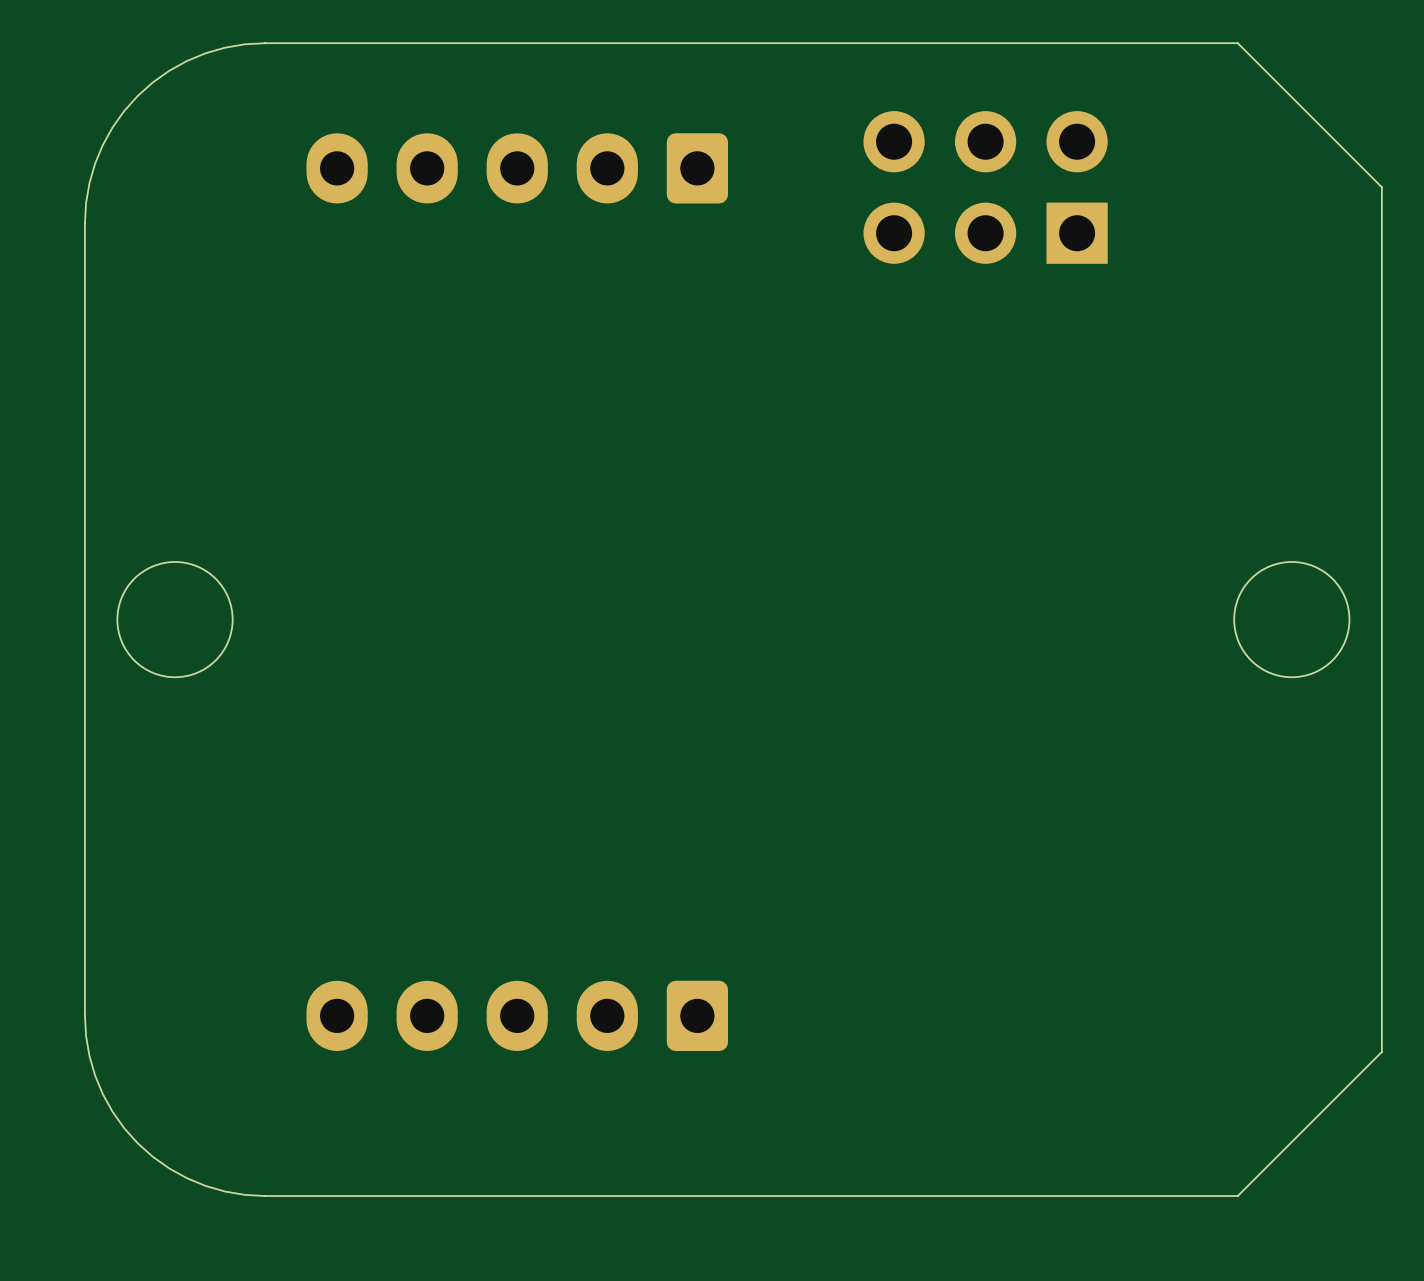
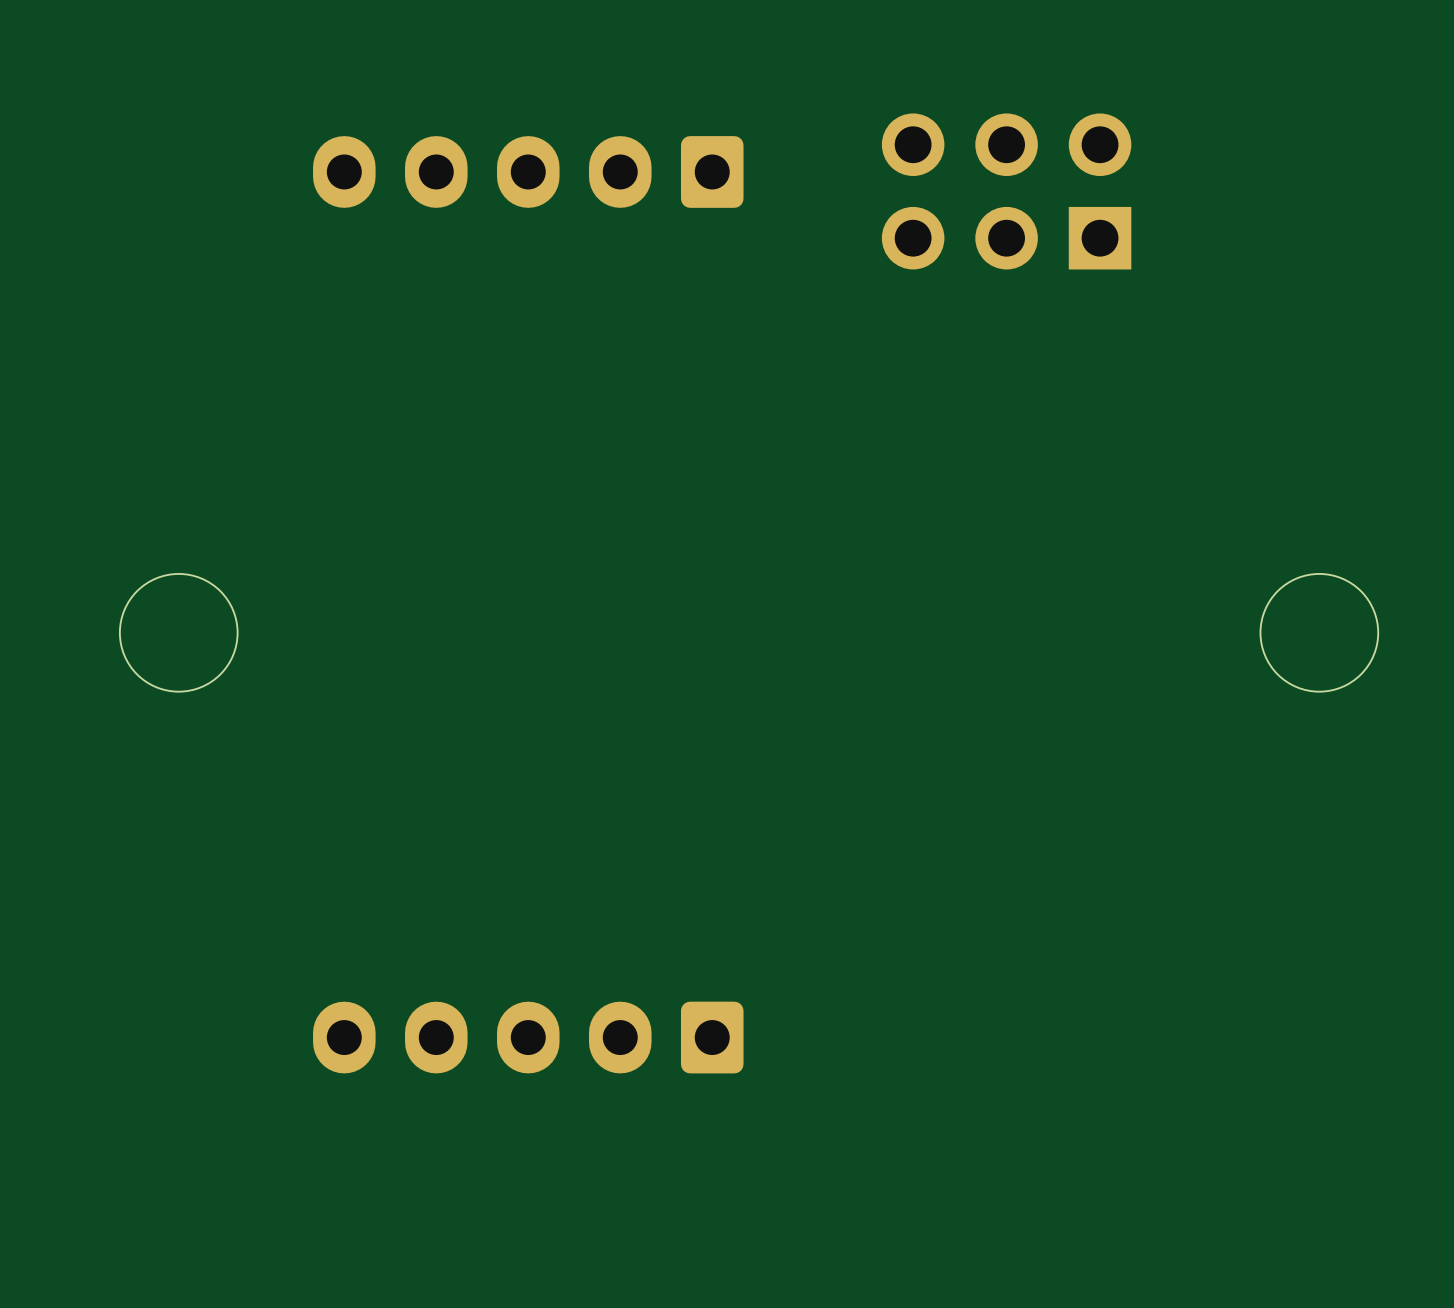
board edge: (1237, 43) (265, 43) (224, 47) (186, 61) (169, 70) (137, 95) (124, 111) (102, 145) (89, 183) (86, 203) (84, 1015) (89, 1055) (102, 1094) (112, 1111) (137, 1143) (169, 1168) (205, 1185) (244, 1194) (265, 1196) (1237, 1196) (1381, 1051) (1381, 187) (1237, 43) -> none

